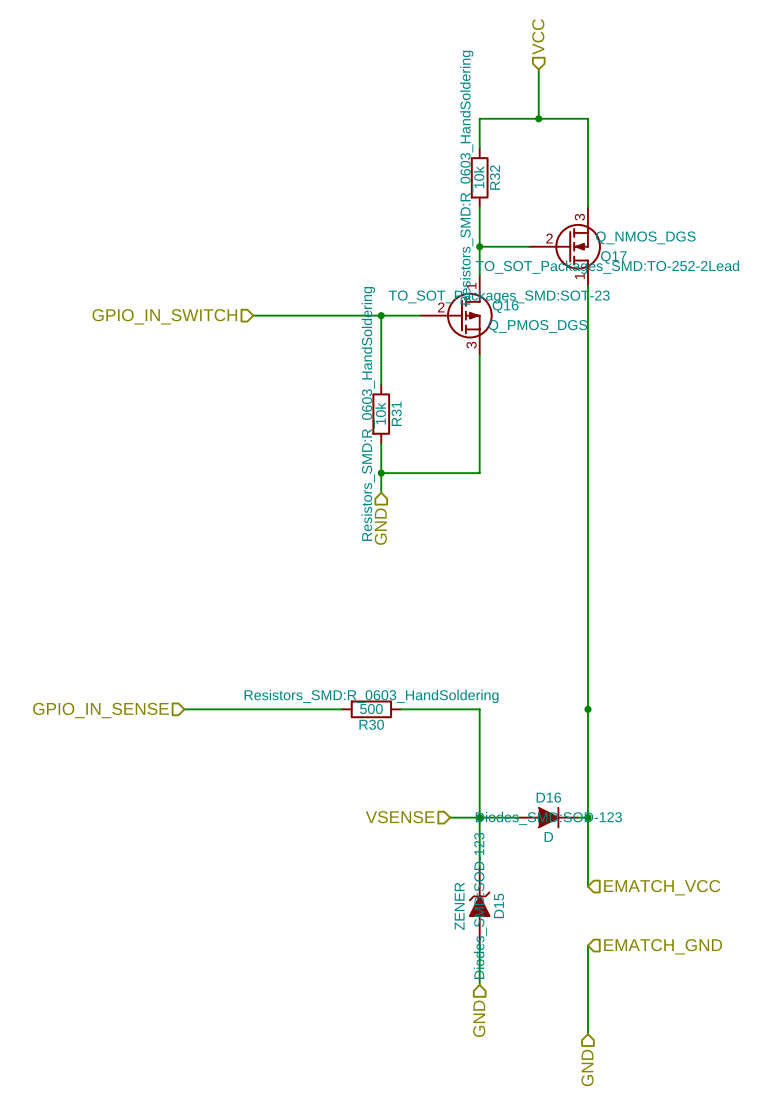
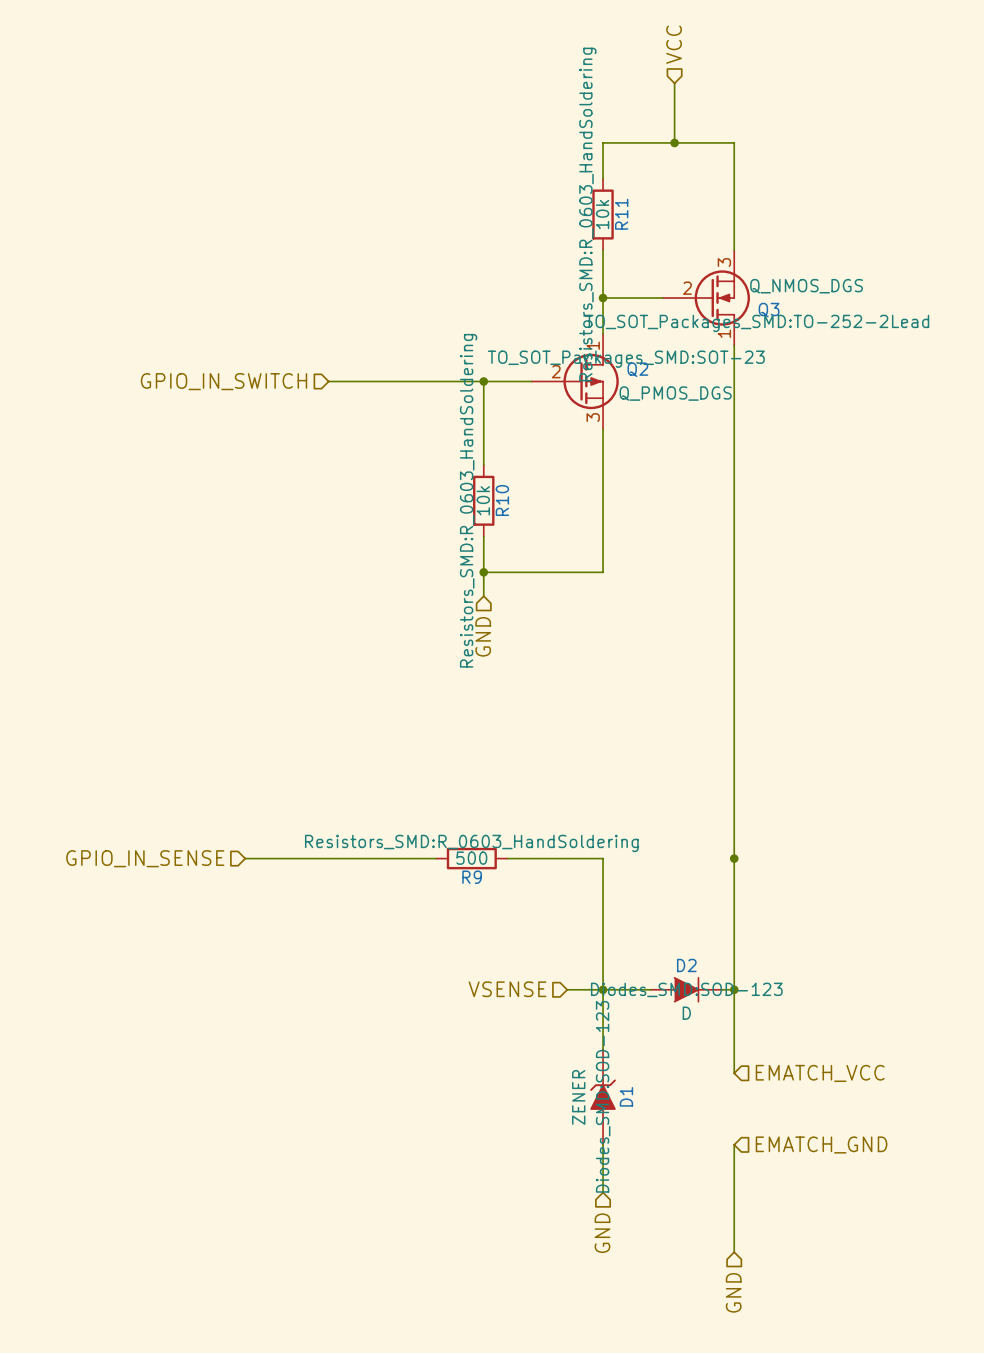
R32 name: R32 (495, 177) -> R11 (621, 214)
Q17 name: Q17 (613, 257) -> Q3 (769, 310)
Q16 name: Q16 (505, 306) -> Q2 (637, 369)
R31 name: R31 (396, 413) -> R10 (502, 500)
R30 name: R30 (371, 724) -> R9 (472, 877)
D16 name: D16 (548, 797) -> D2 (686, 965)
D15 name: D15 (499, 905) -> D1 (626, 1096)

